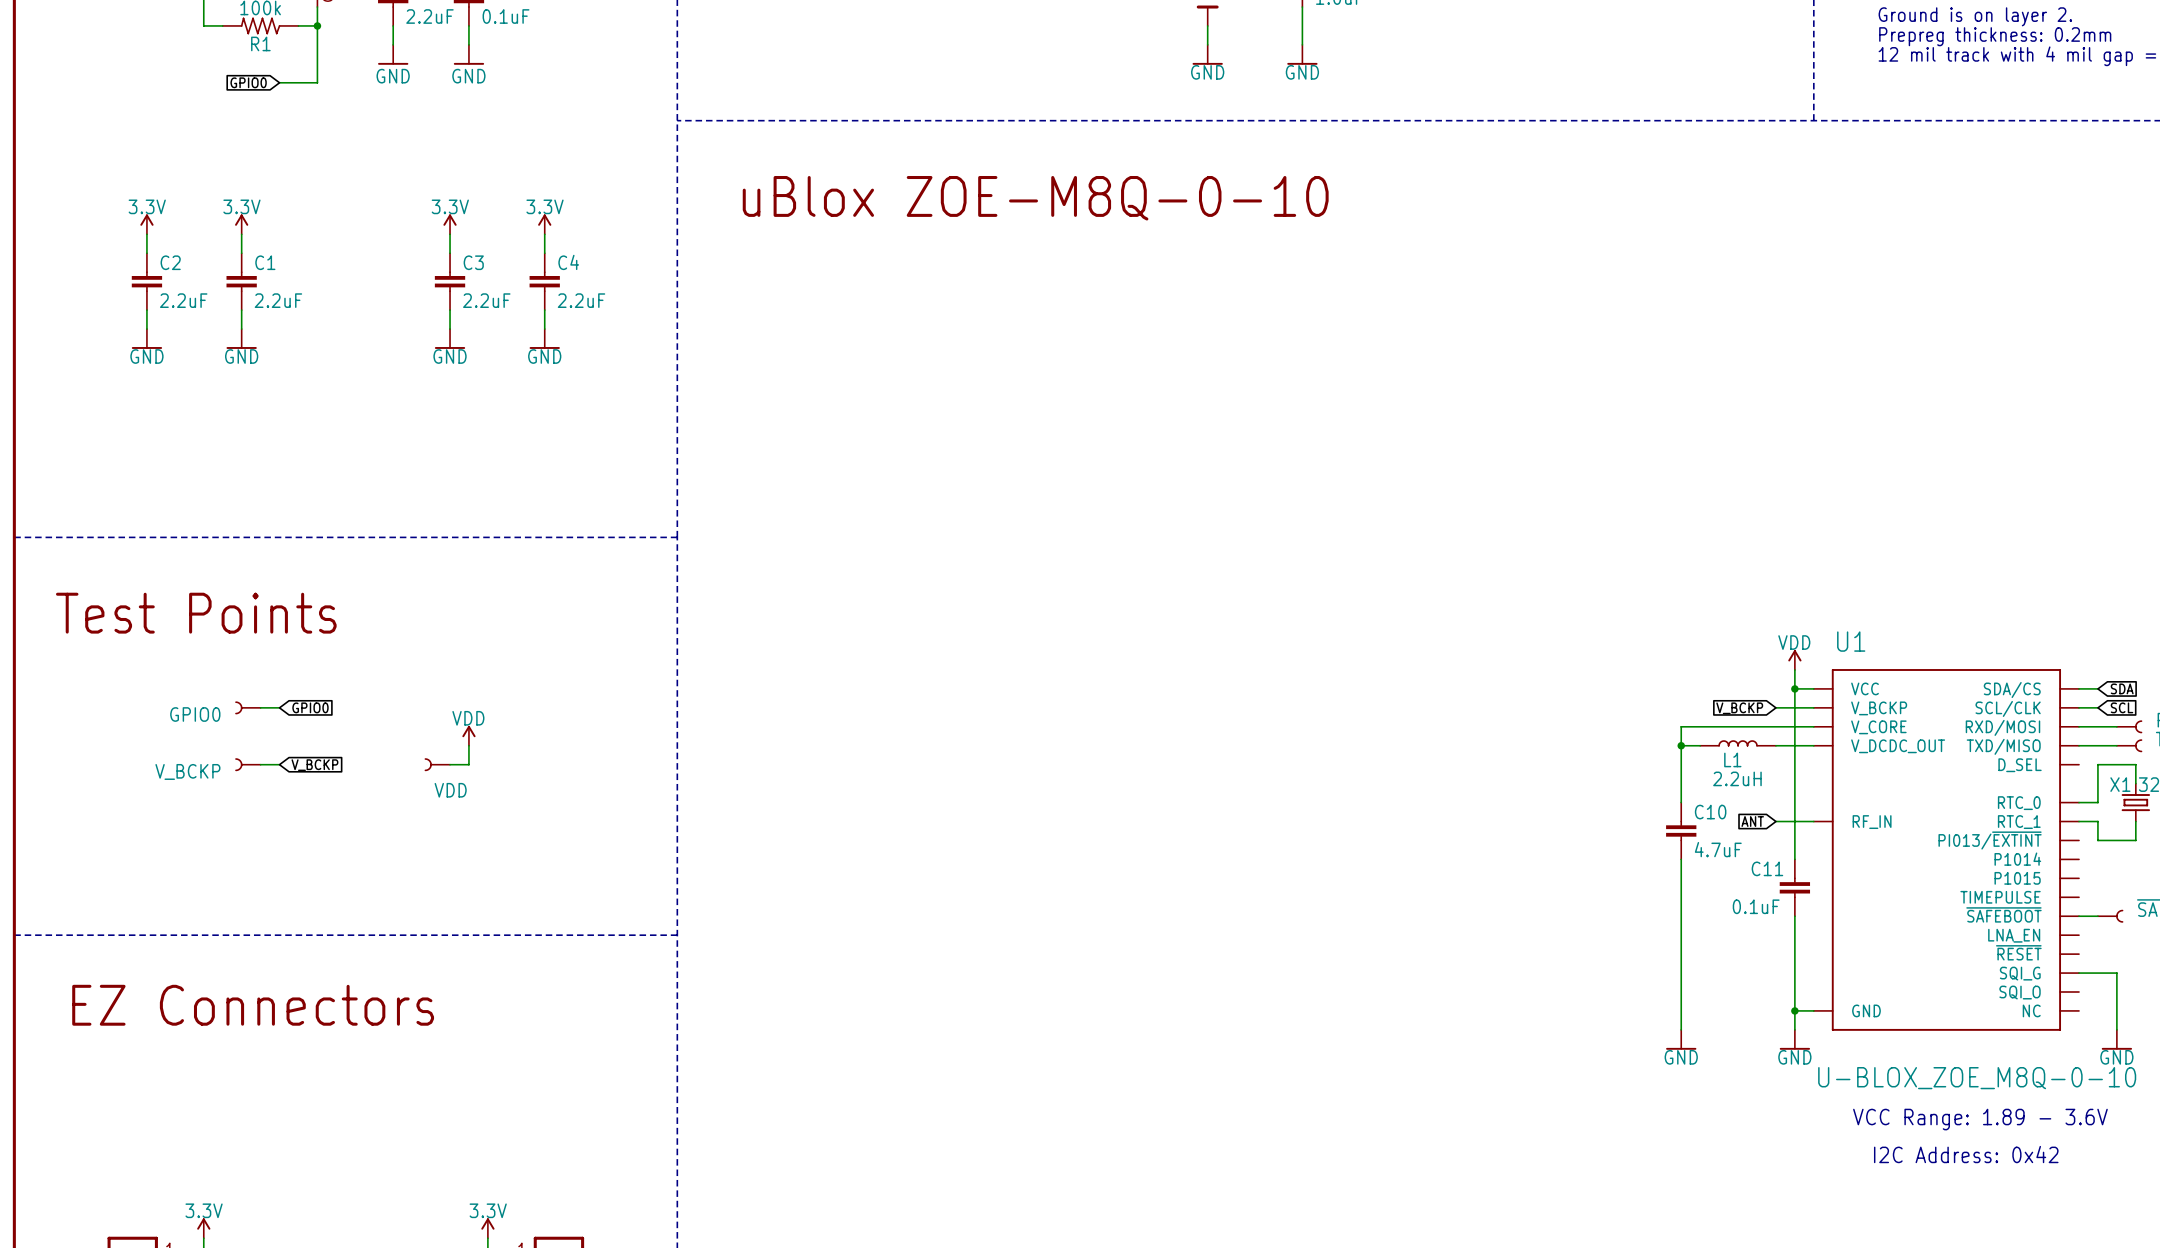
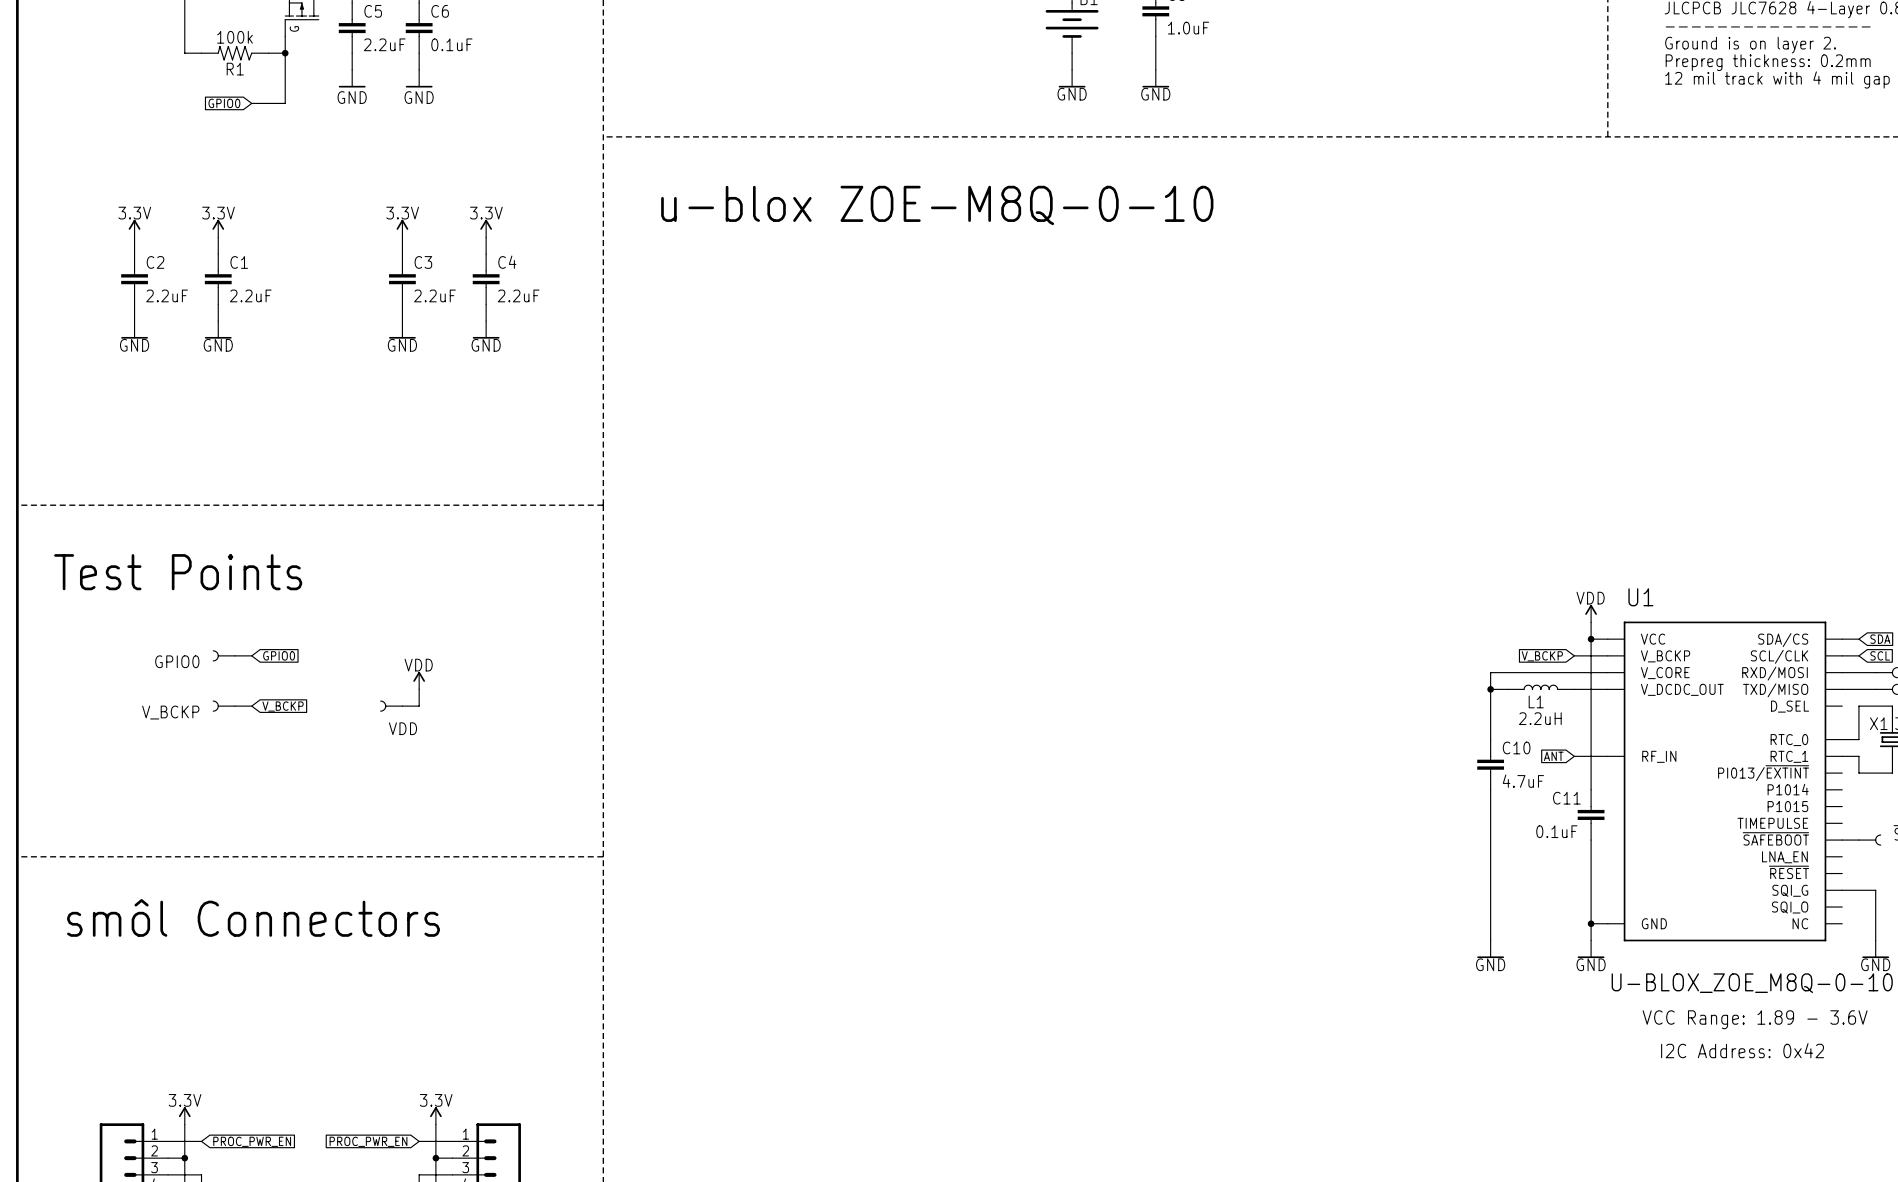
text: uBlox ZOE-M8Q-0-10 (1035, 198) -> u-blox ZOE-M8Q-0-10 (937, 205)
text: EZ Connectors (253, 1005) -> smôl Connectors (253, 917)

